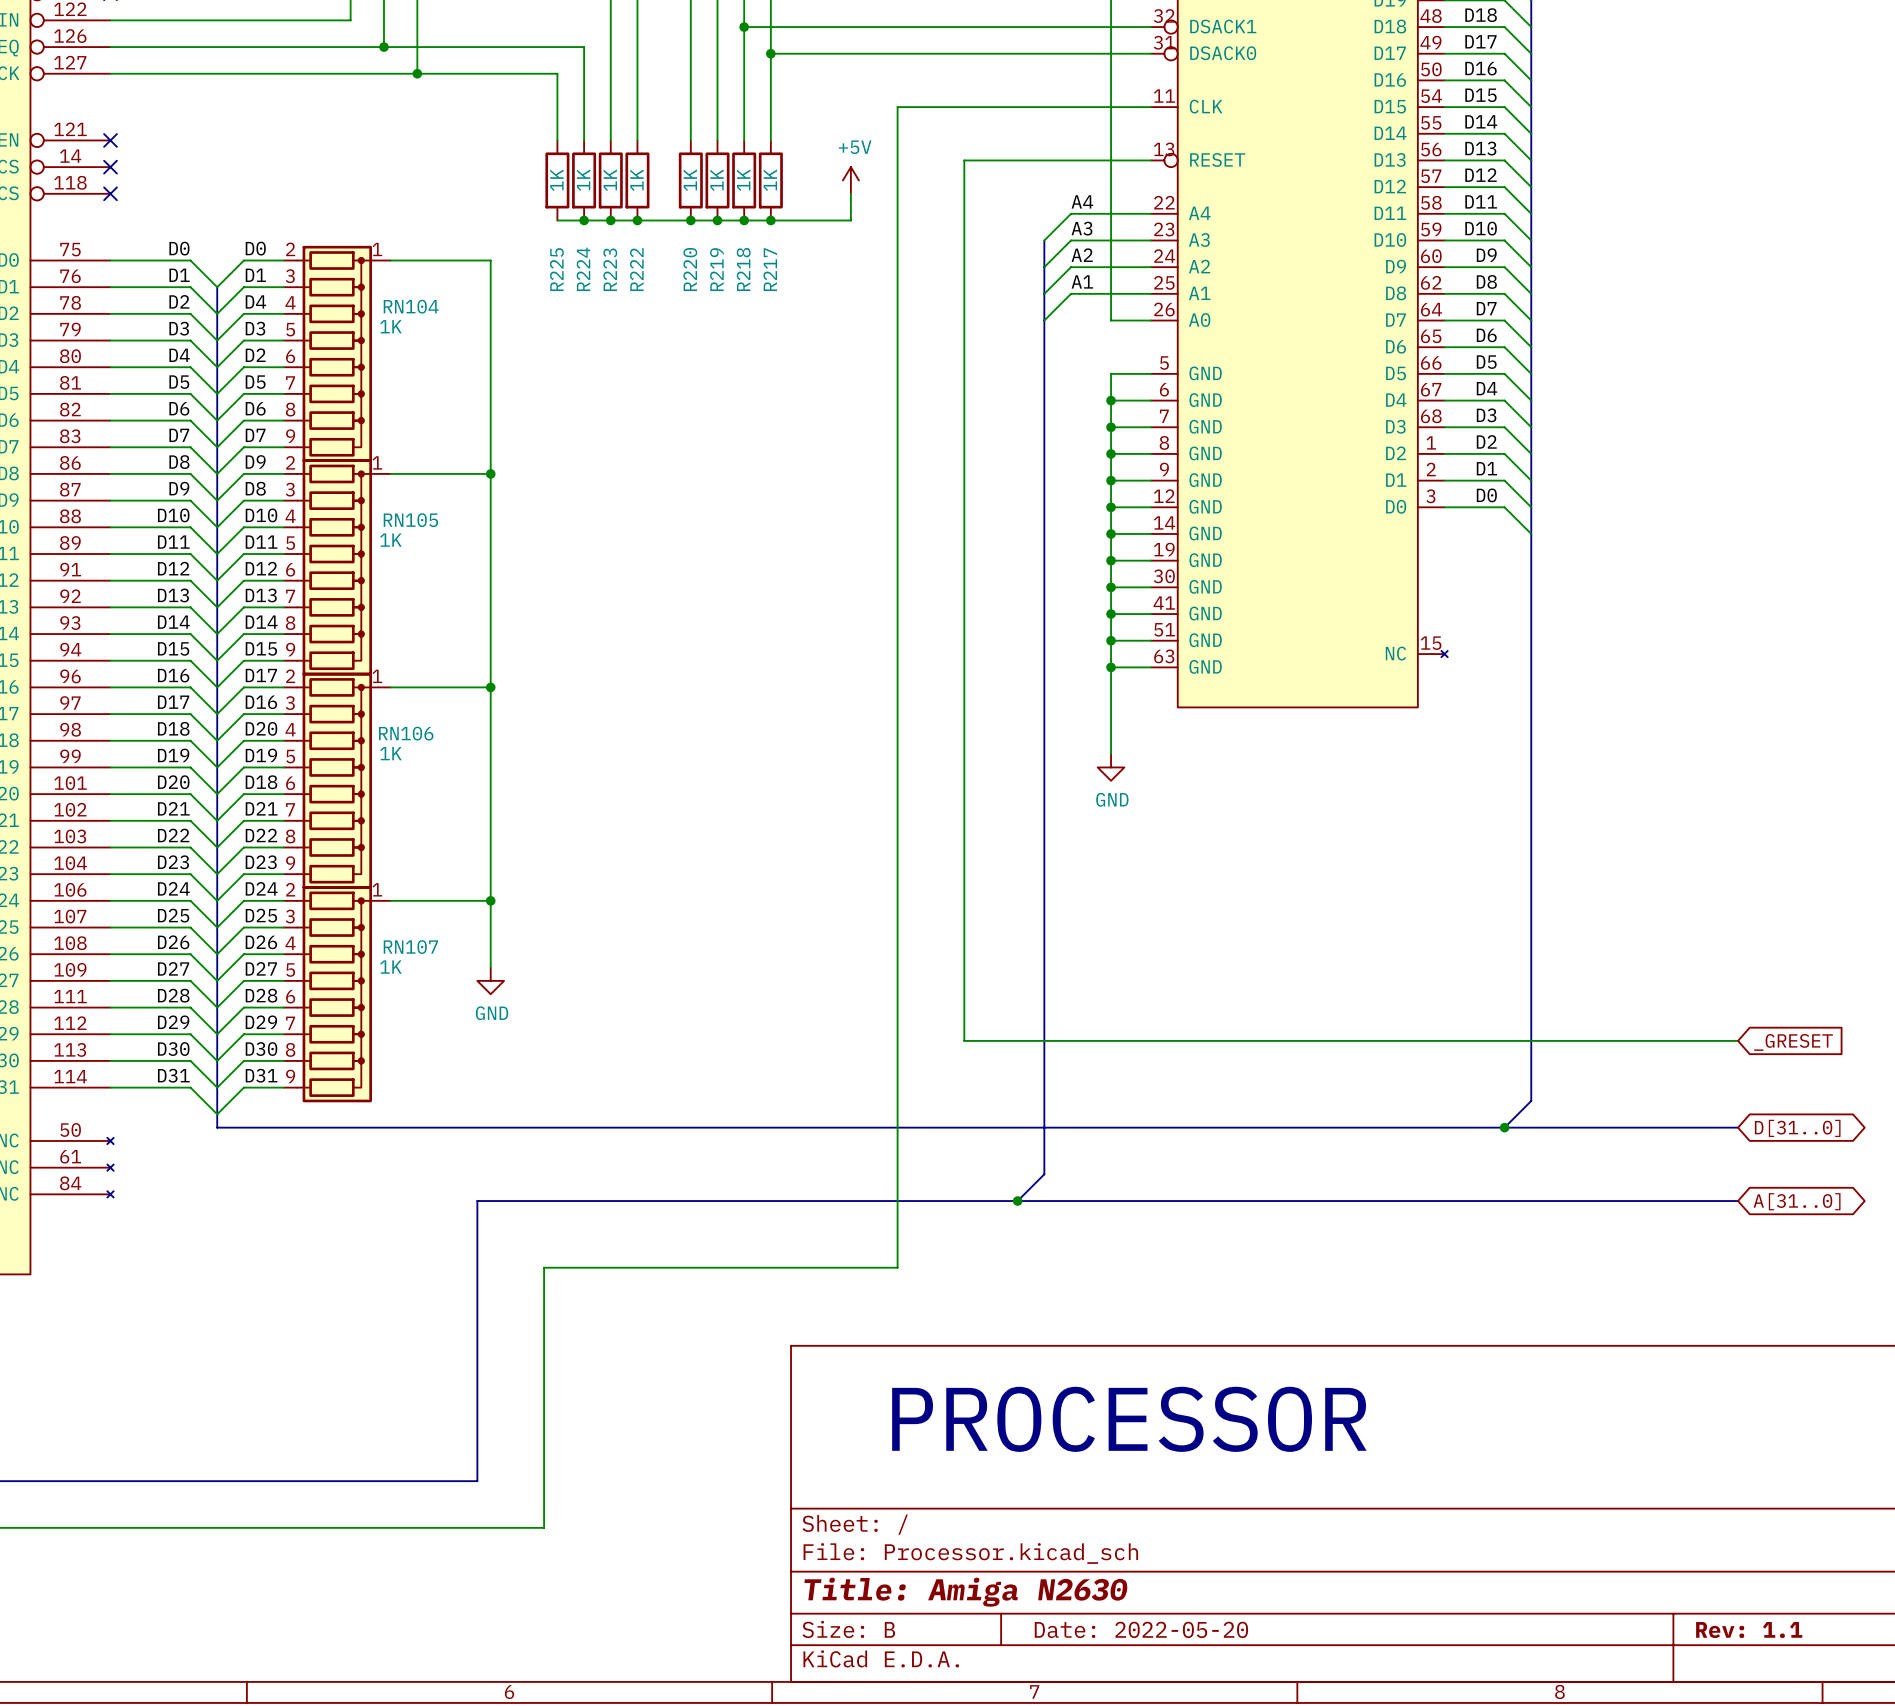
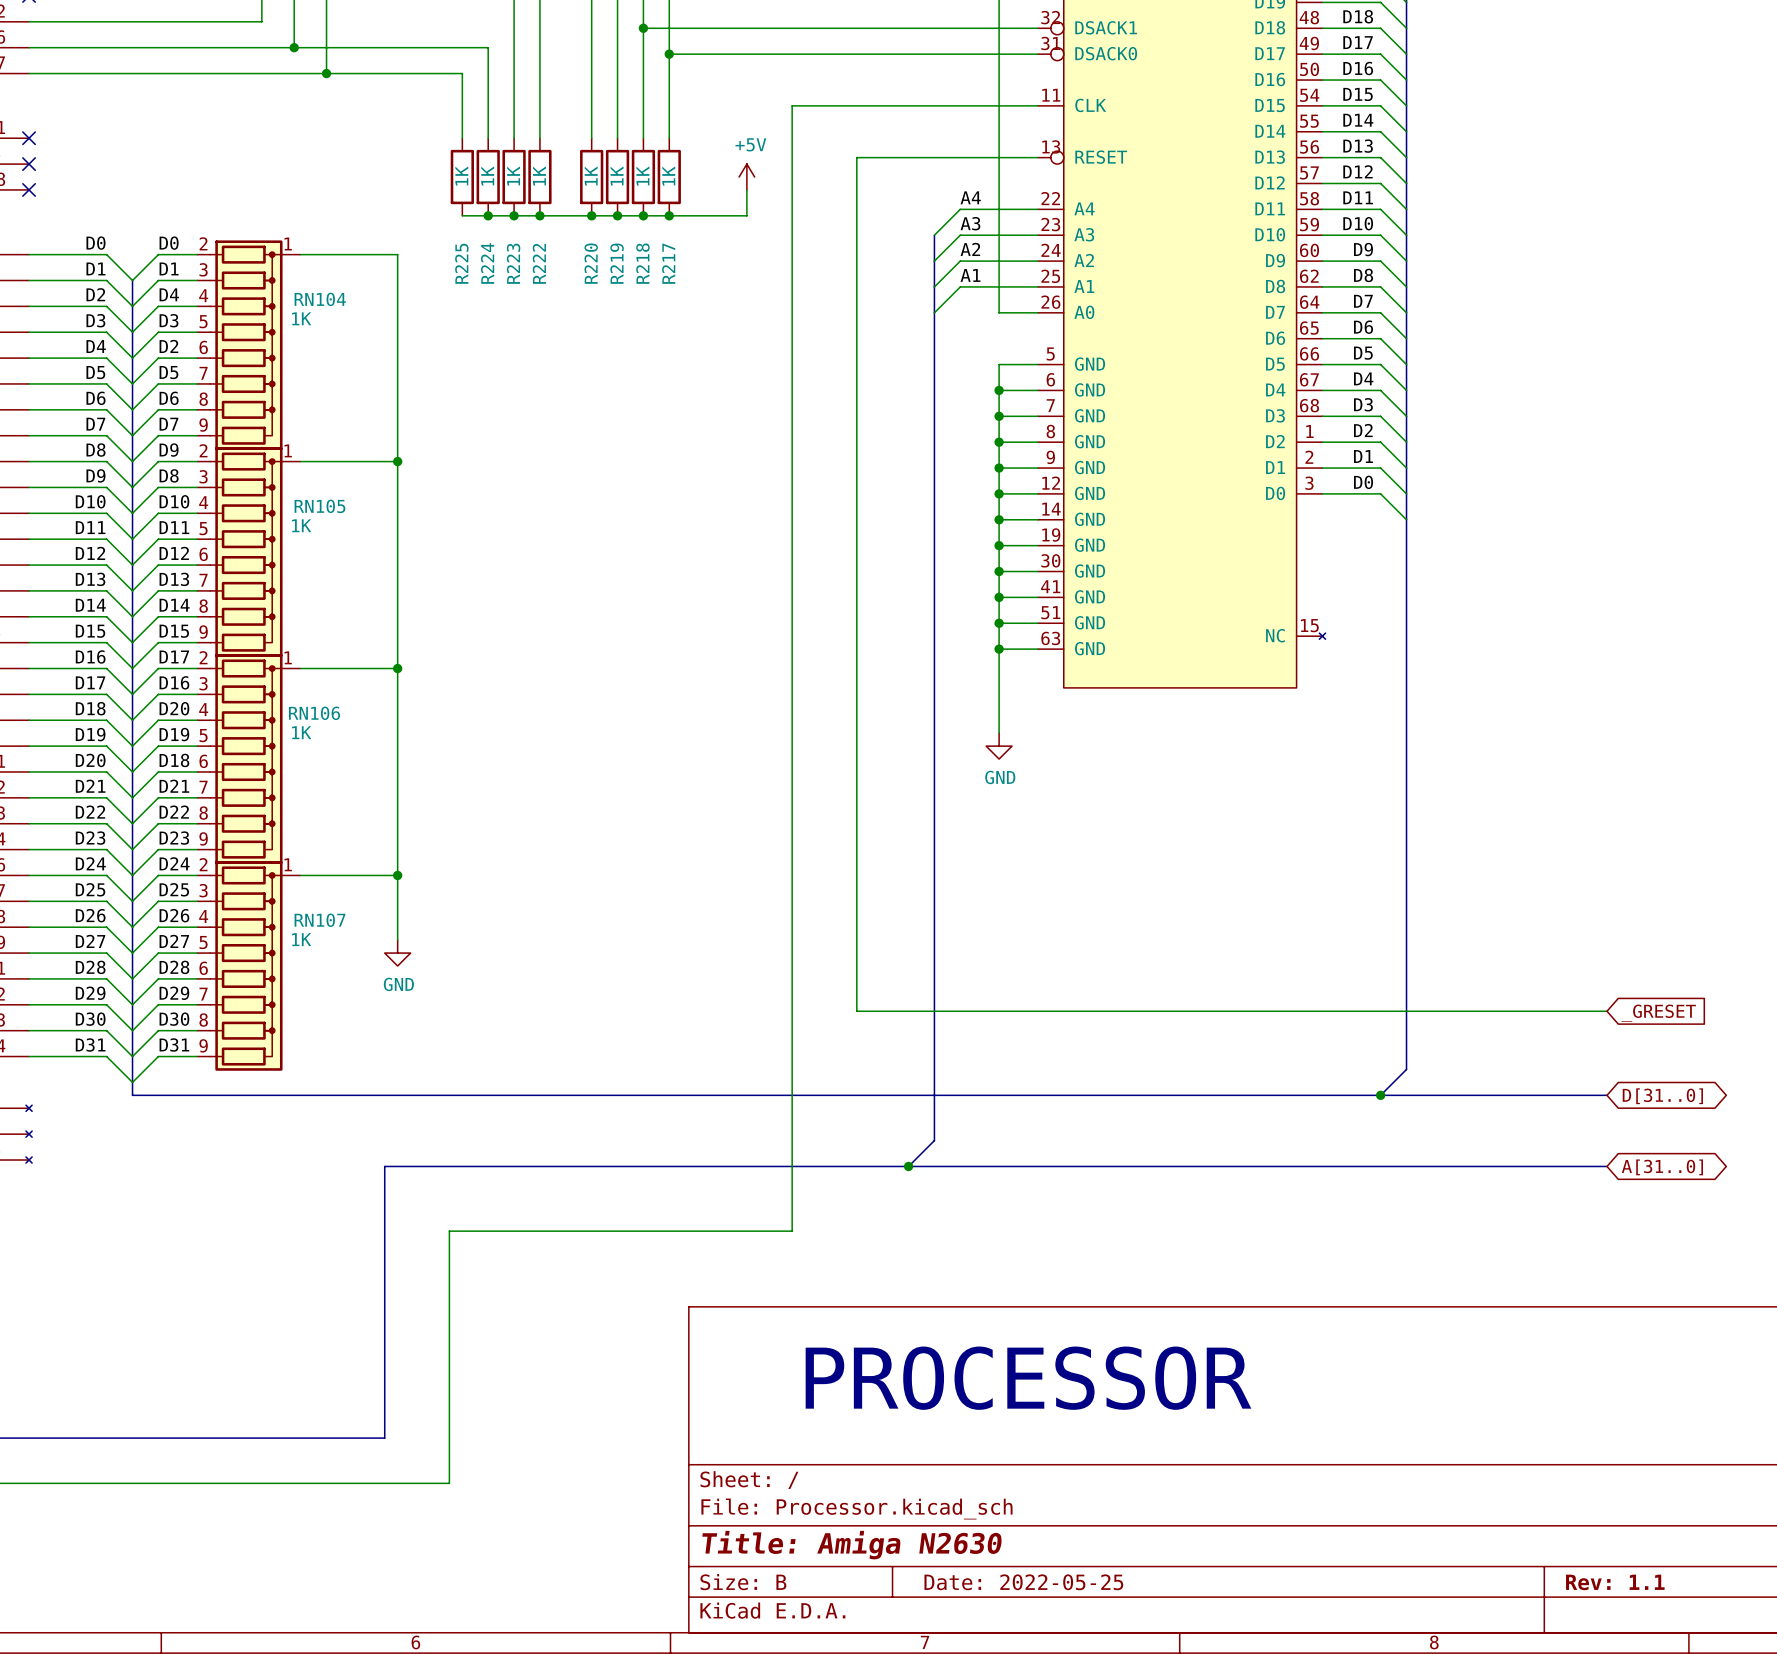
title block: Date: 2022-05-20 (1141, 1629) -> Date: 2022-05-25 (1023, 1582)

